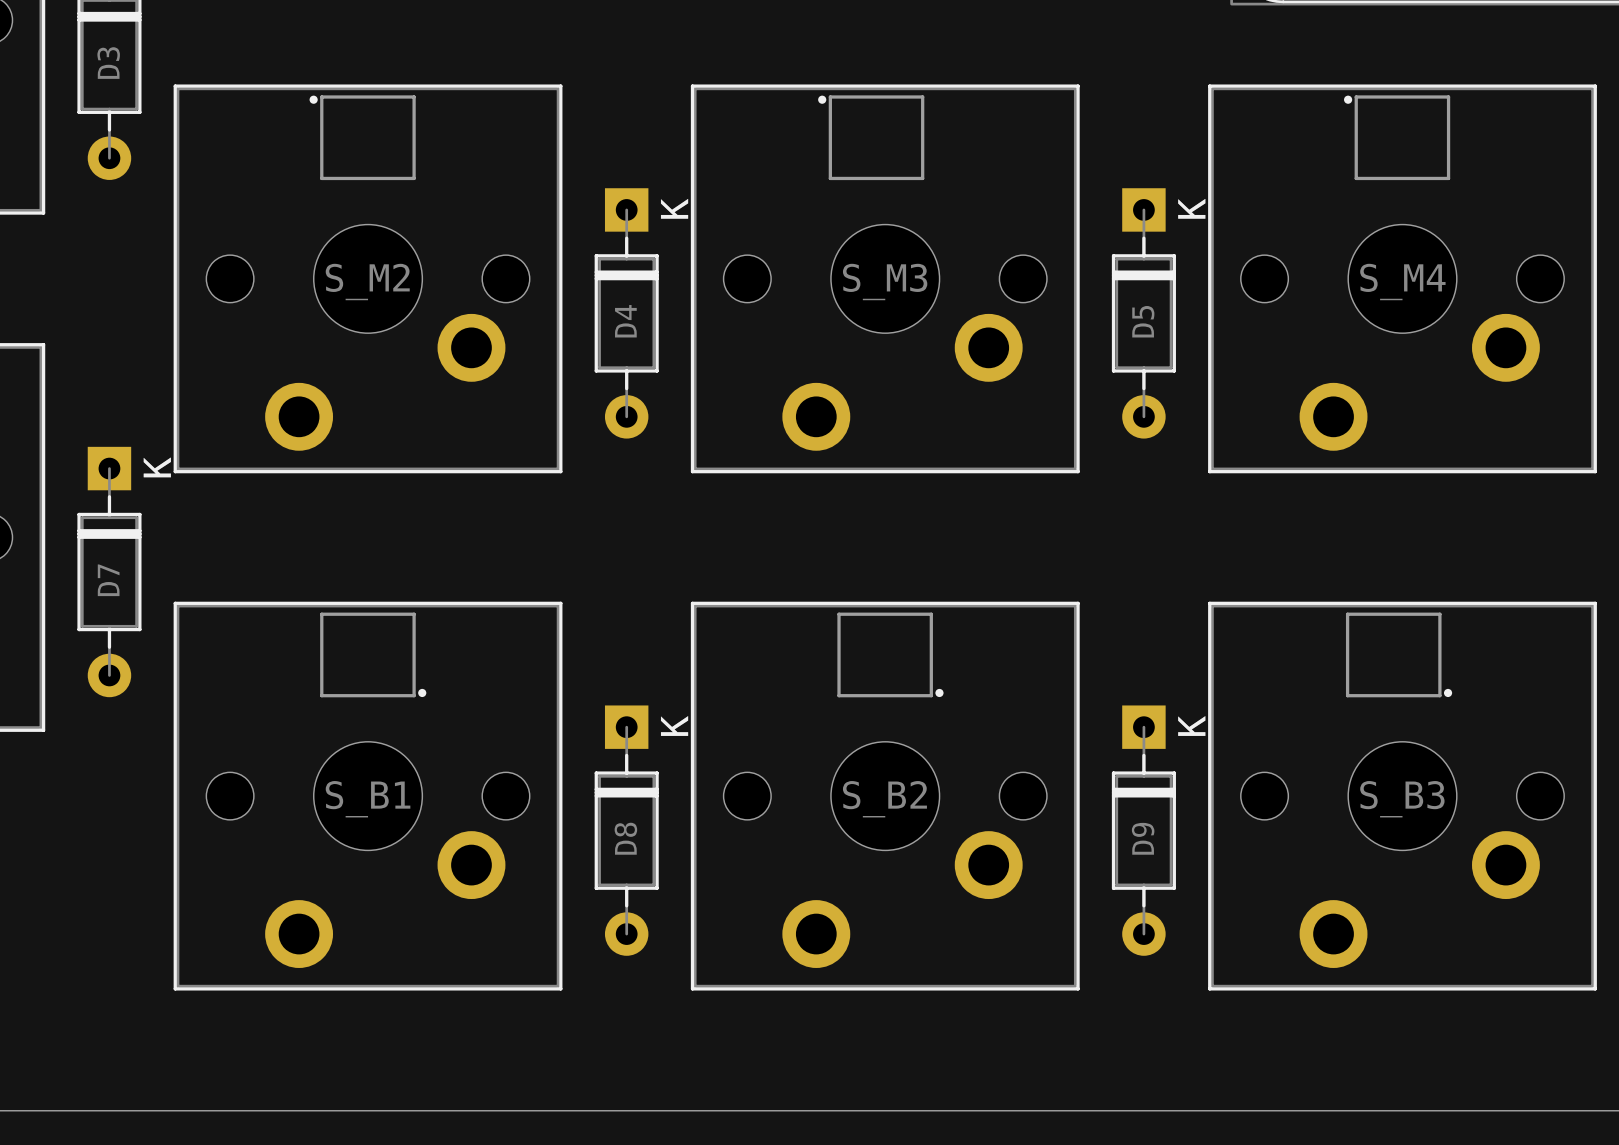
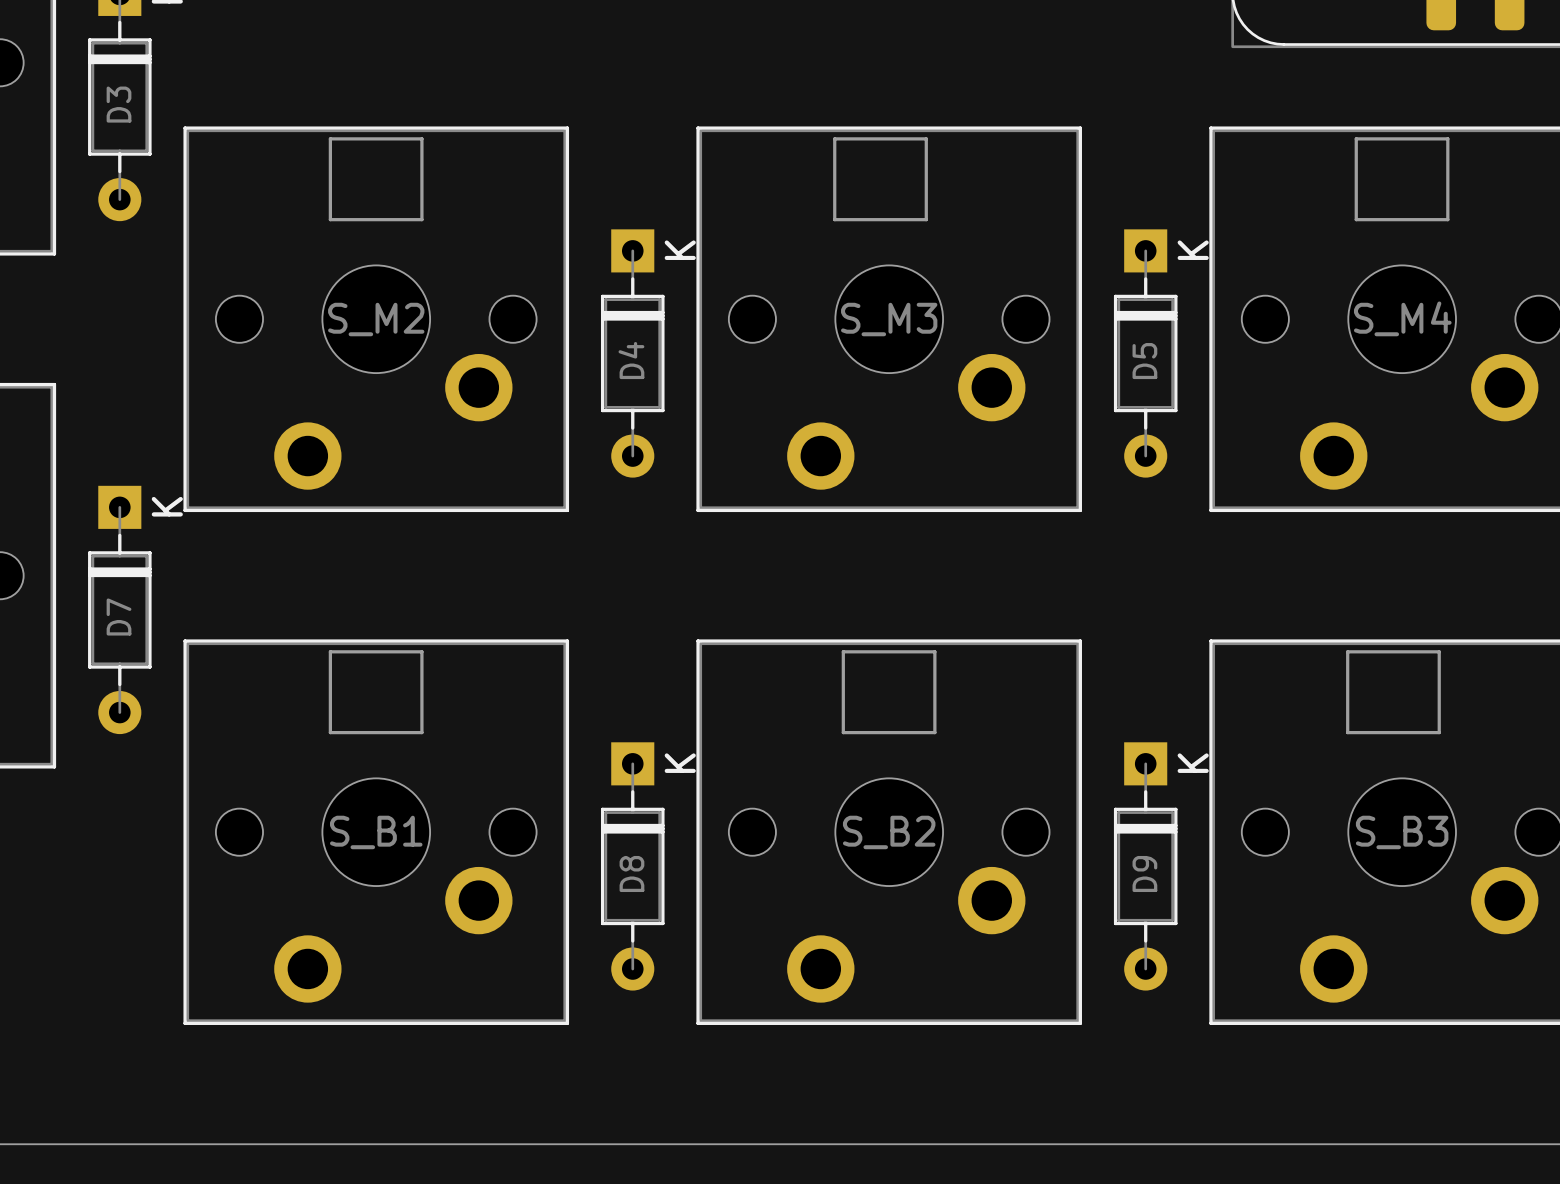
part footprint: [309, 95, 416, 181] -> [328, 137, 424, 222]
part footprint: [818, 95, 925, 181] -> [833, 137, 928, 222]
part footprint: [1344, 95, 1451, 181] -> [1354, 137, 1450, 222]
part footprint: [320, 612, 427, 698] -> [328, 650, 424, 735]
part footprint: [837, 612, 944, 698] -> [841, 650, 937, 735]
part footprint: [1345, 612, 1453, 698] -> [1346, 650, 1441, 735]

